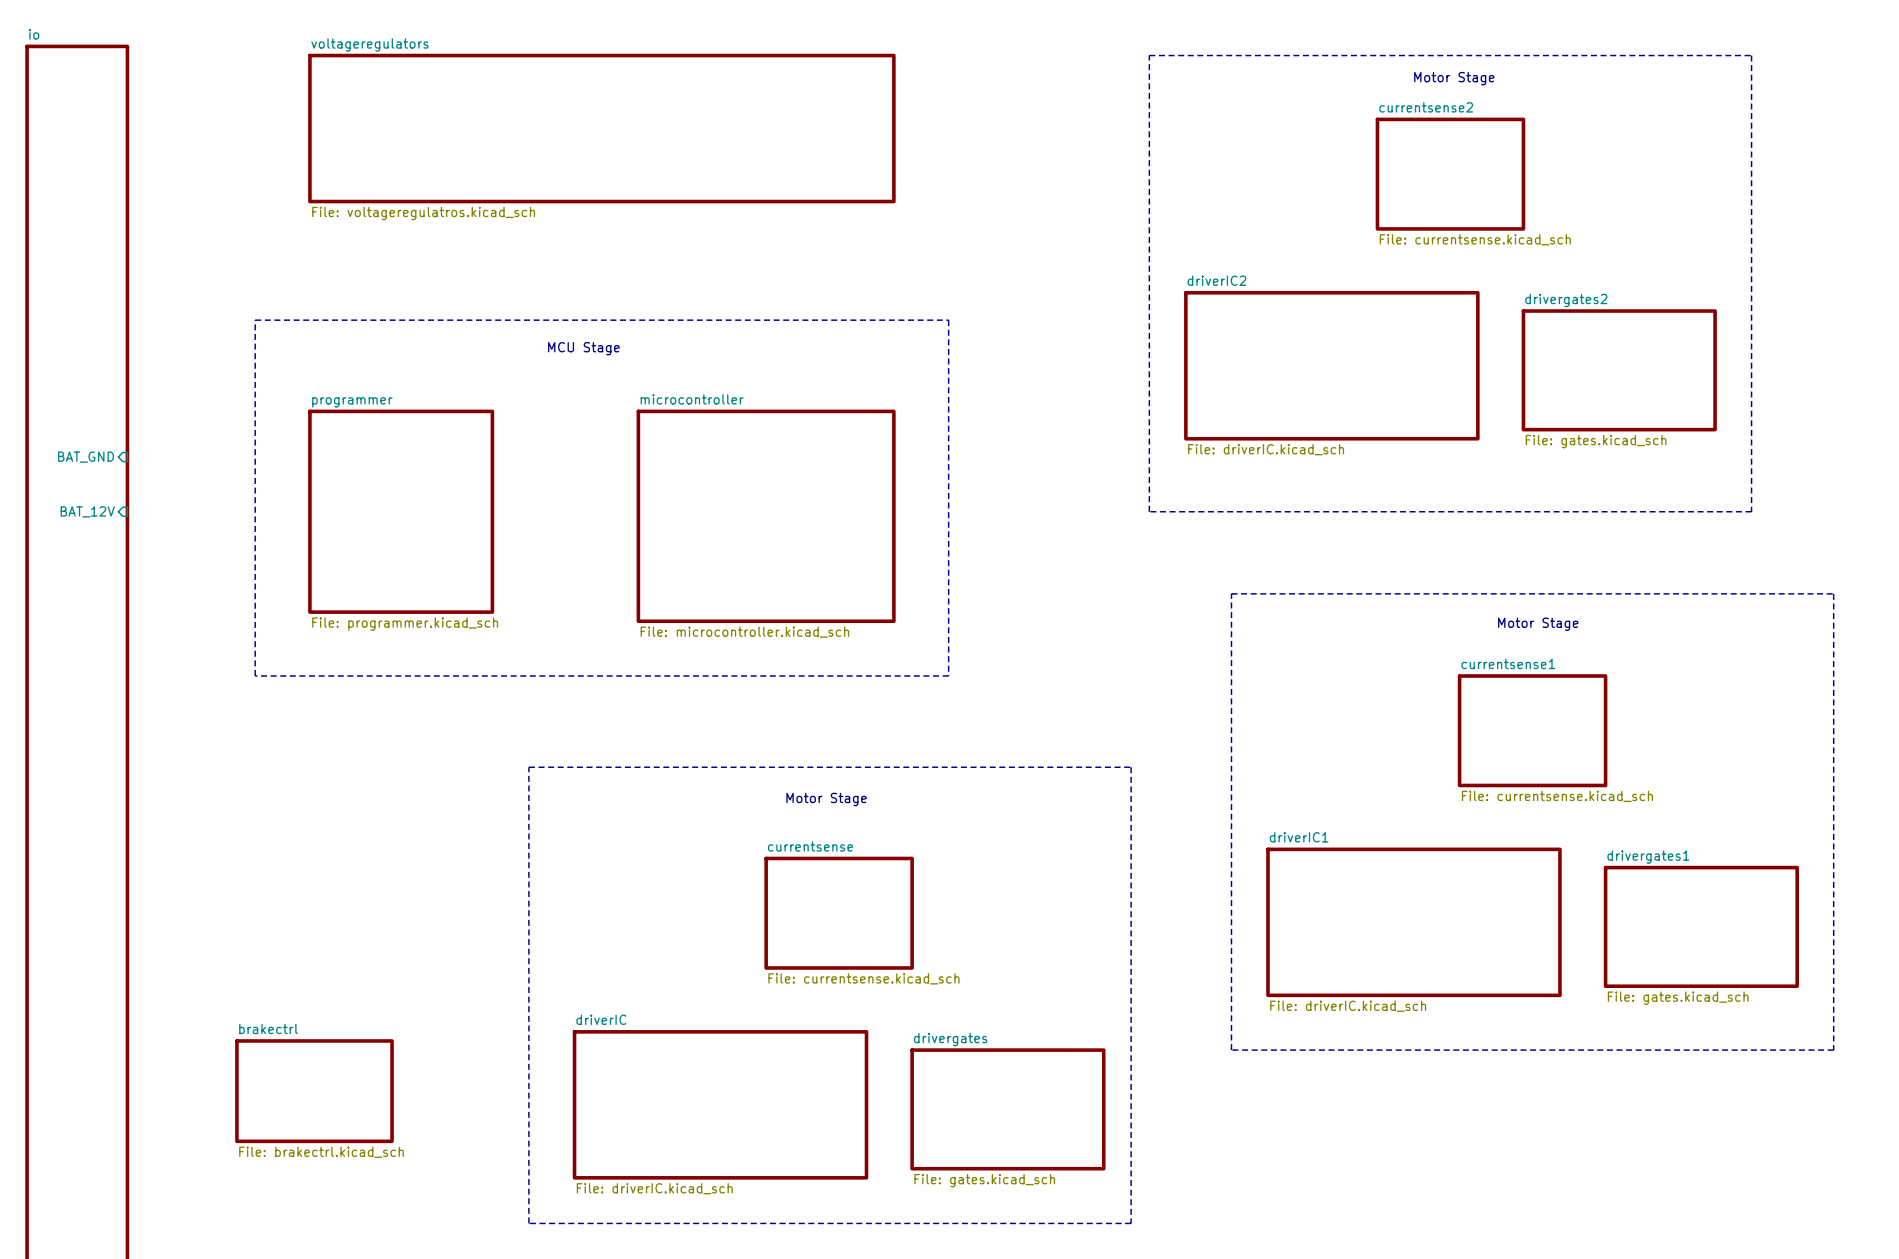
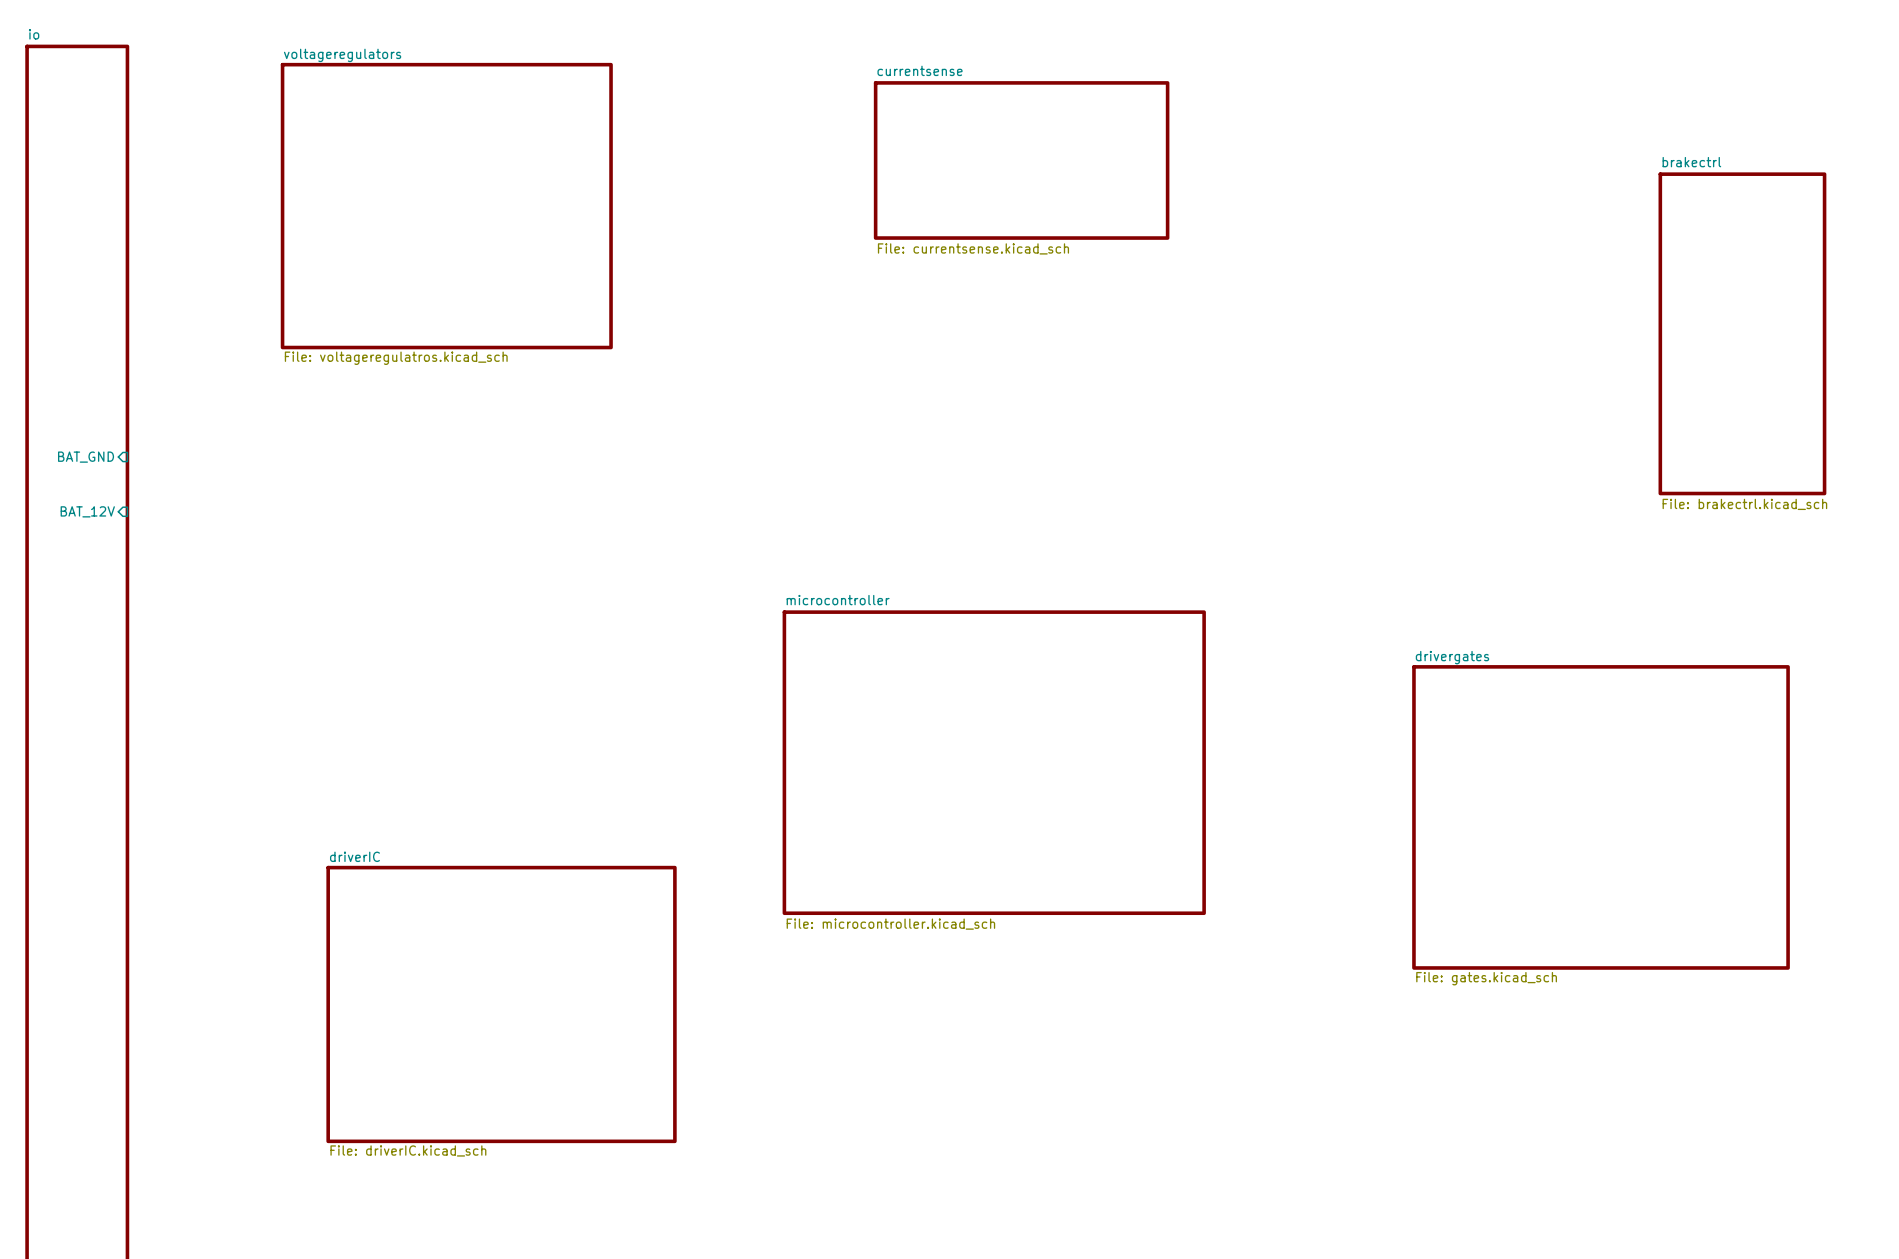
line: (1149, 55) (1751, 55) (1751, 511) (1149, 511) (1149, 55) -> none
text: Motor Stage (1454, 78) -> none
sheet voltageregulators: File: voltageregulatros.kicad_sch (601, 128) -> none
sheet currentsense: none -> File: currentsense.kicad_sch (1021, 160)
sheet currentsense2: File: currentsense.kicad_sch (1450, 174) -> none
sheet voltageregulators: none -> File: voltageregulatros.kicad_sch (446, 206)
line: (255, 320) (948, 320) (948, 676) (255, 676) (255, 320) -> none
sheet brakectrl: none -> File: brakectrl.kicad_sch (1742, 333)
text: MCU Stage (583, 348) -> none
sheet driverIC2: File: driverIC.kicad_sch (1331, 365) -> none
sheet drivergates2: File: gates.kicad_sch (1619, 370) -> none
sheet programmer: File: programmer.kicad_sch (401, 511) -> none
sheet microcontroller: File: microcontroller.kicad_sch (766, 516) -> none
line: (1231, 593) (1833, 593) (1833, 1050) (1231, 1050) (1231, 593) -> none
text: Motor Stage (1538, 624) -> none
sheet currentsense1: File: currentsense.kicad_sch (1532, 730) -> none
sheet microcontroller: none -> File: microcontroller.kicad_sch (994, 762)
line: (528, 767) (1131, 767) (1131, 1223) (528, 1223) (528, 767) -> none
text: Motor Stage (826, 799) -> none
sheet drivergates: none -> File: gates.kicad_sch (1601, 817)
sheet currentsense: File: currentsense.kicad_sch (839, 913) -> none
sheet driverIC1: File: driverIC.kicad_sch (1413, 922) -> none
sheet drivergates1: File: gates.kicad_sch (1701, 926) -> none
sheet driverIC: none -> File: driverIC.kicad_sch (501, 1004)
sheet brakectrl: File: brakectrl.kicad_sch (314, 1091) -> none
sheet driverIC: File: driverIC.kicad_sch (720, 1104) -> none
sheet drivergates: File: gates.kicad_sch (1007, 1109) -> none

